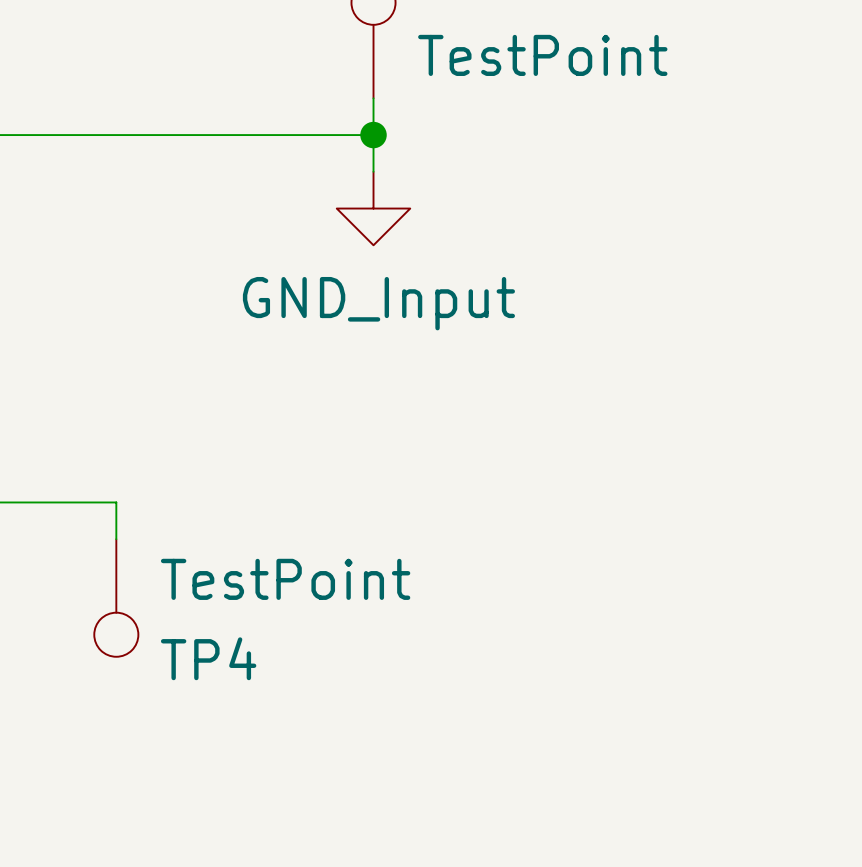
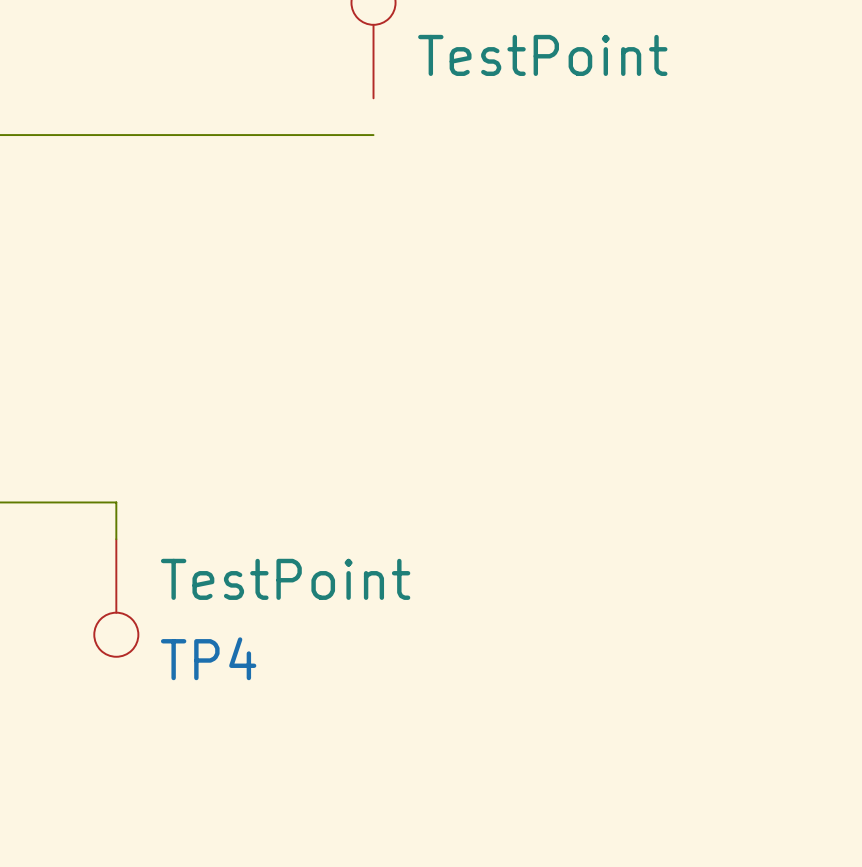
wire: (373, 98) (373, 171) -> none
junction: (373, 135) -> none
power symbol: GND_Input (373, 208) -> none

